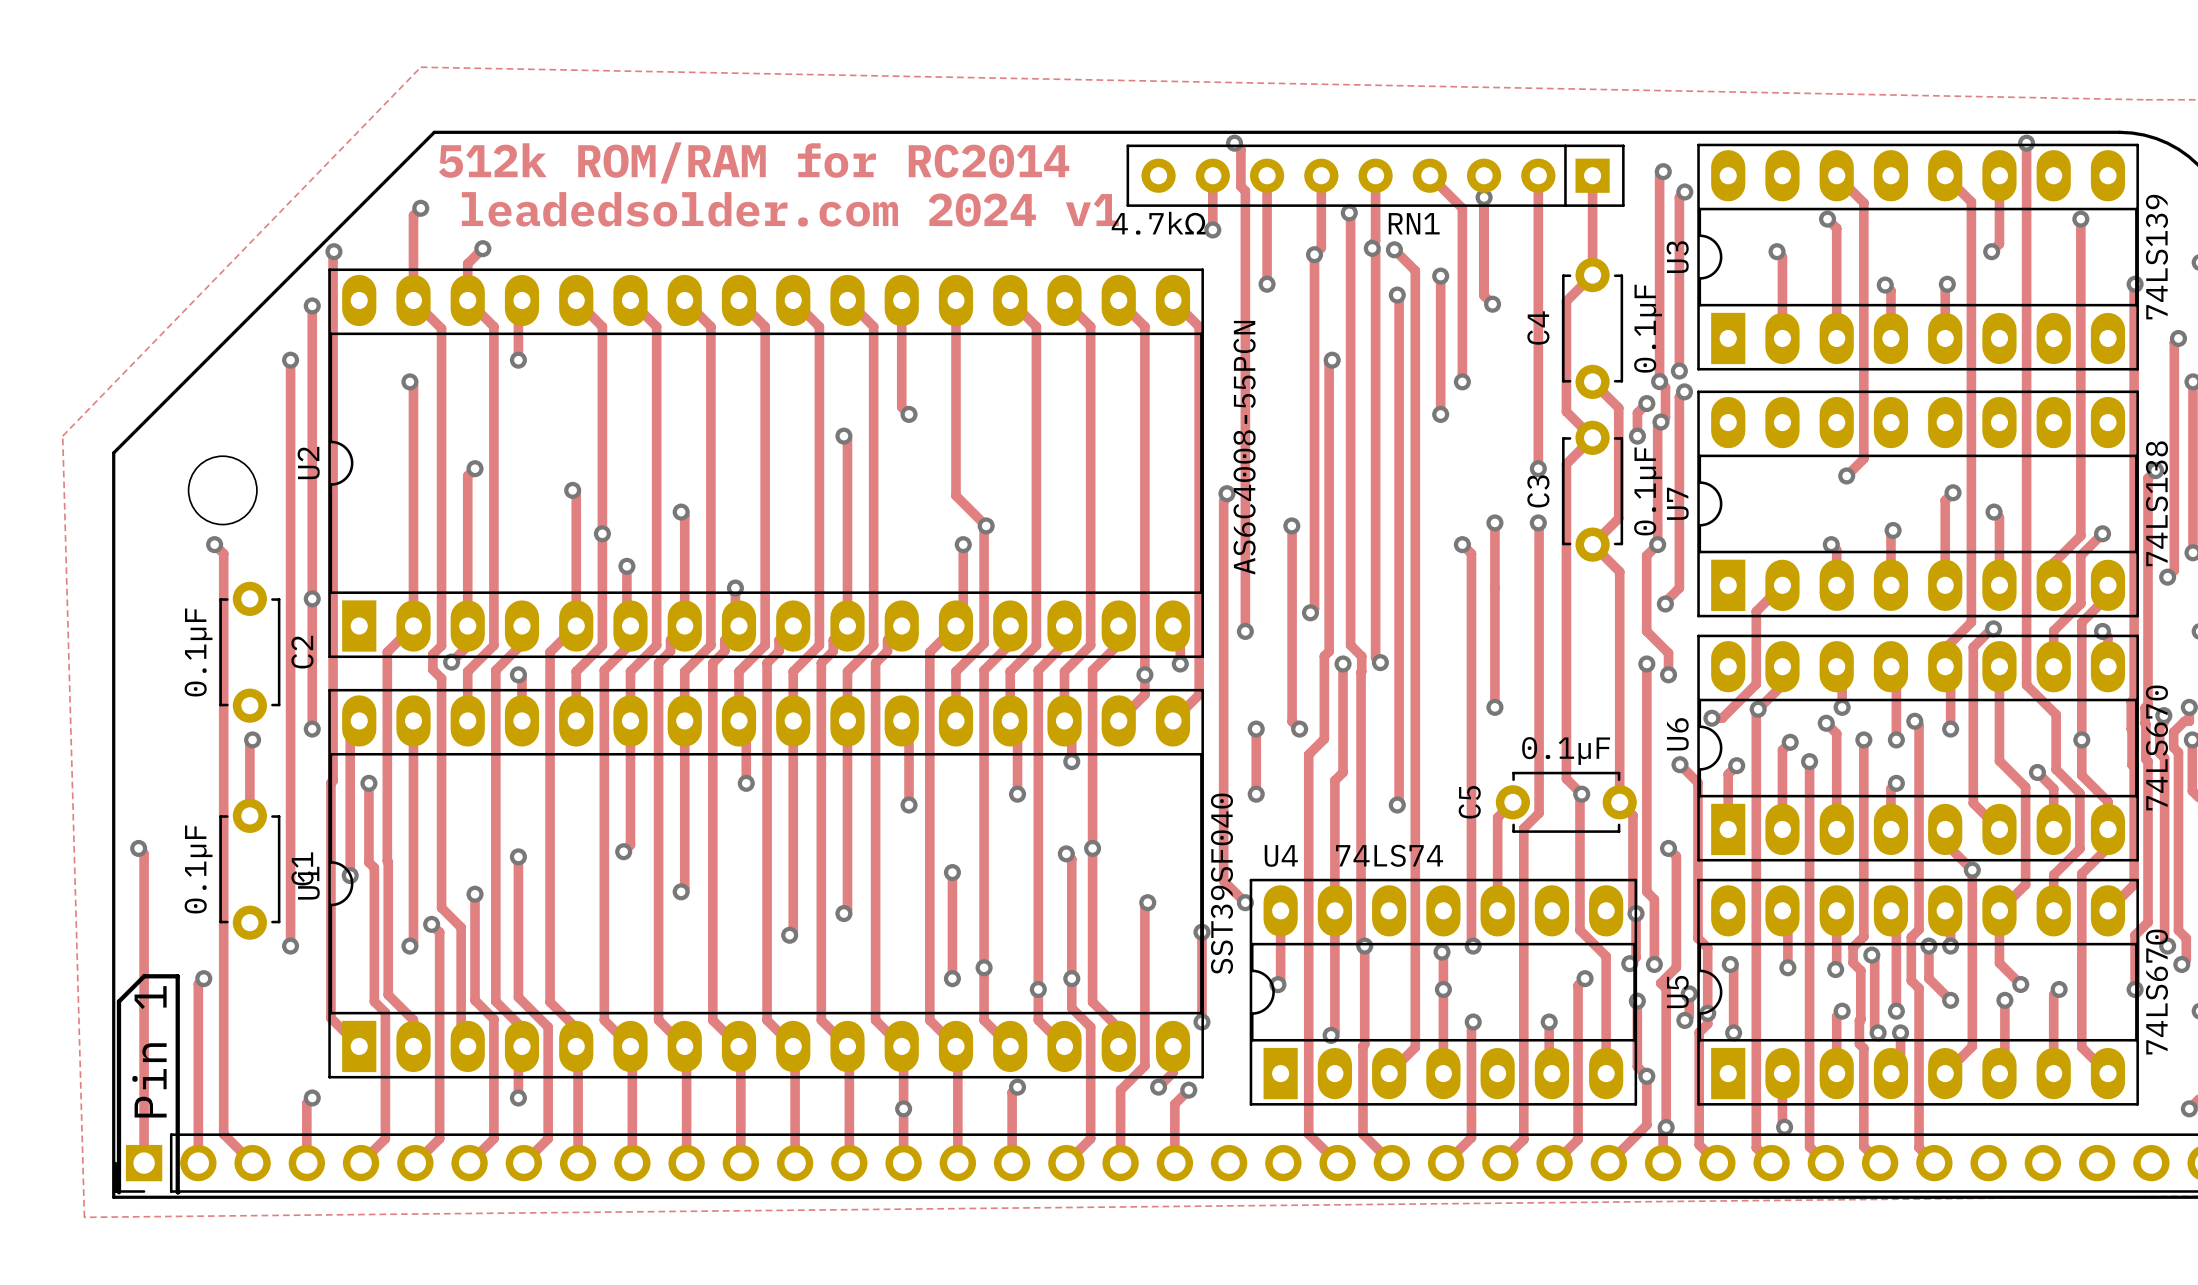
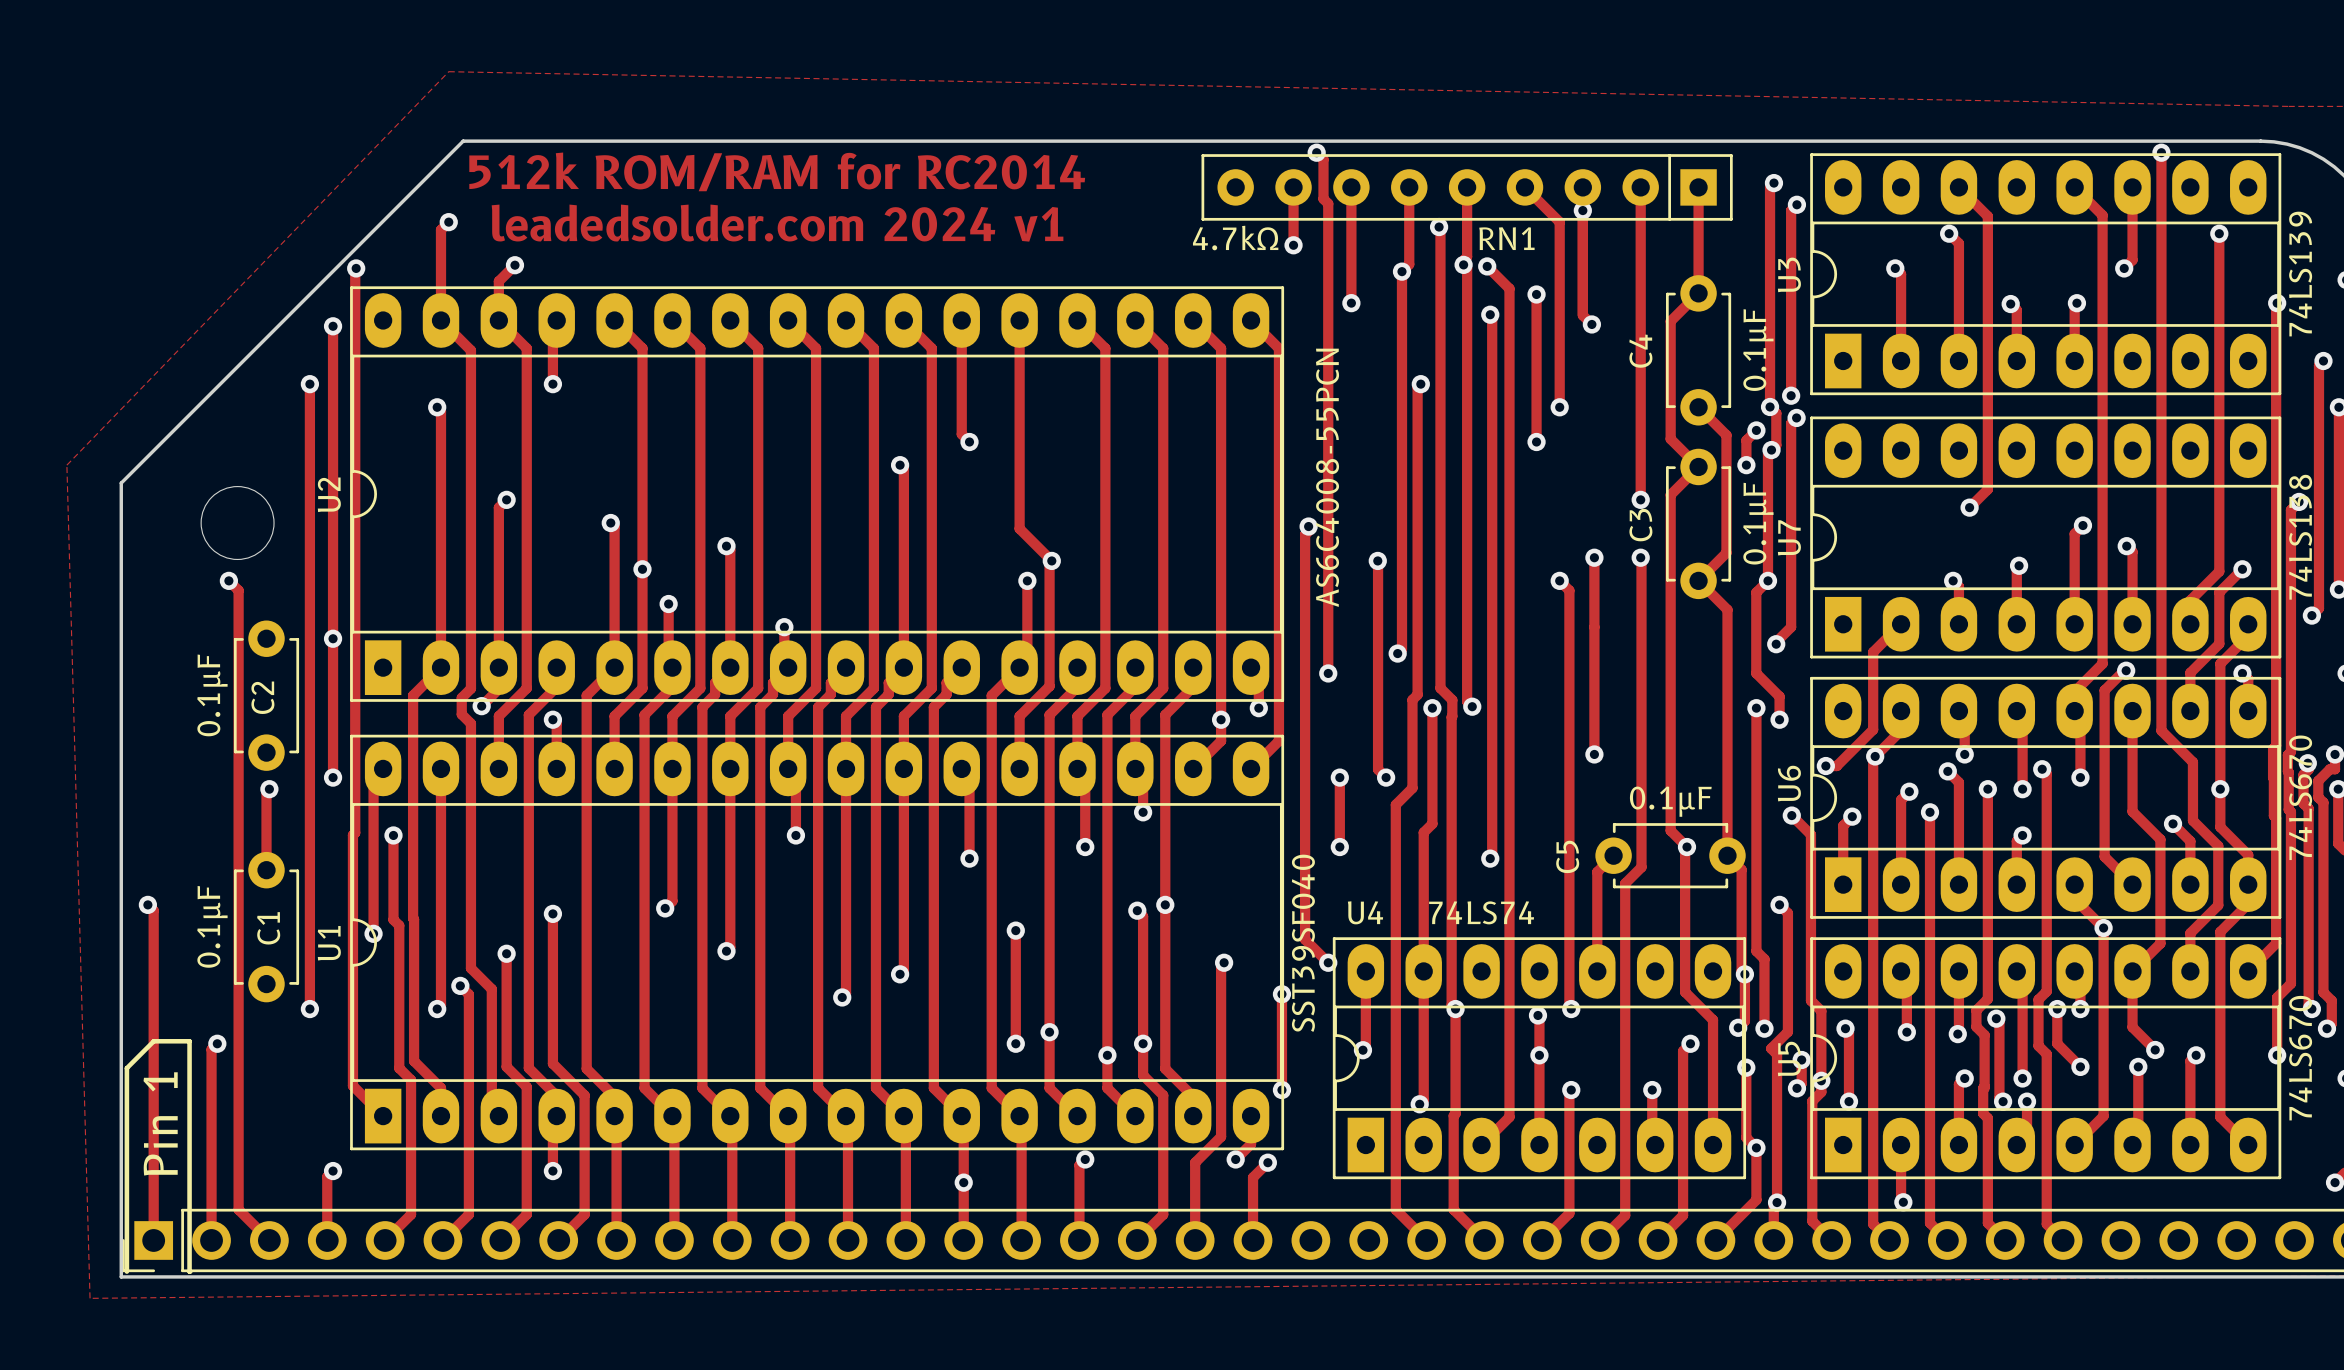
C2 name position: C2 (302, 652) -> C2 (262, 697)
C1 name position: C1 (302, 868) -> C1 (268, 928)

